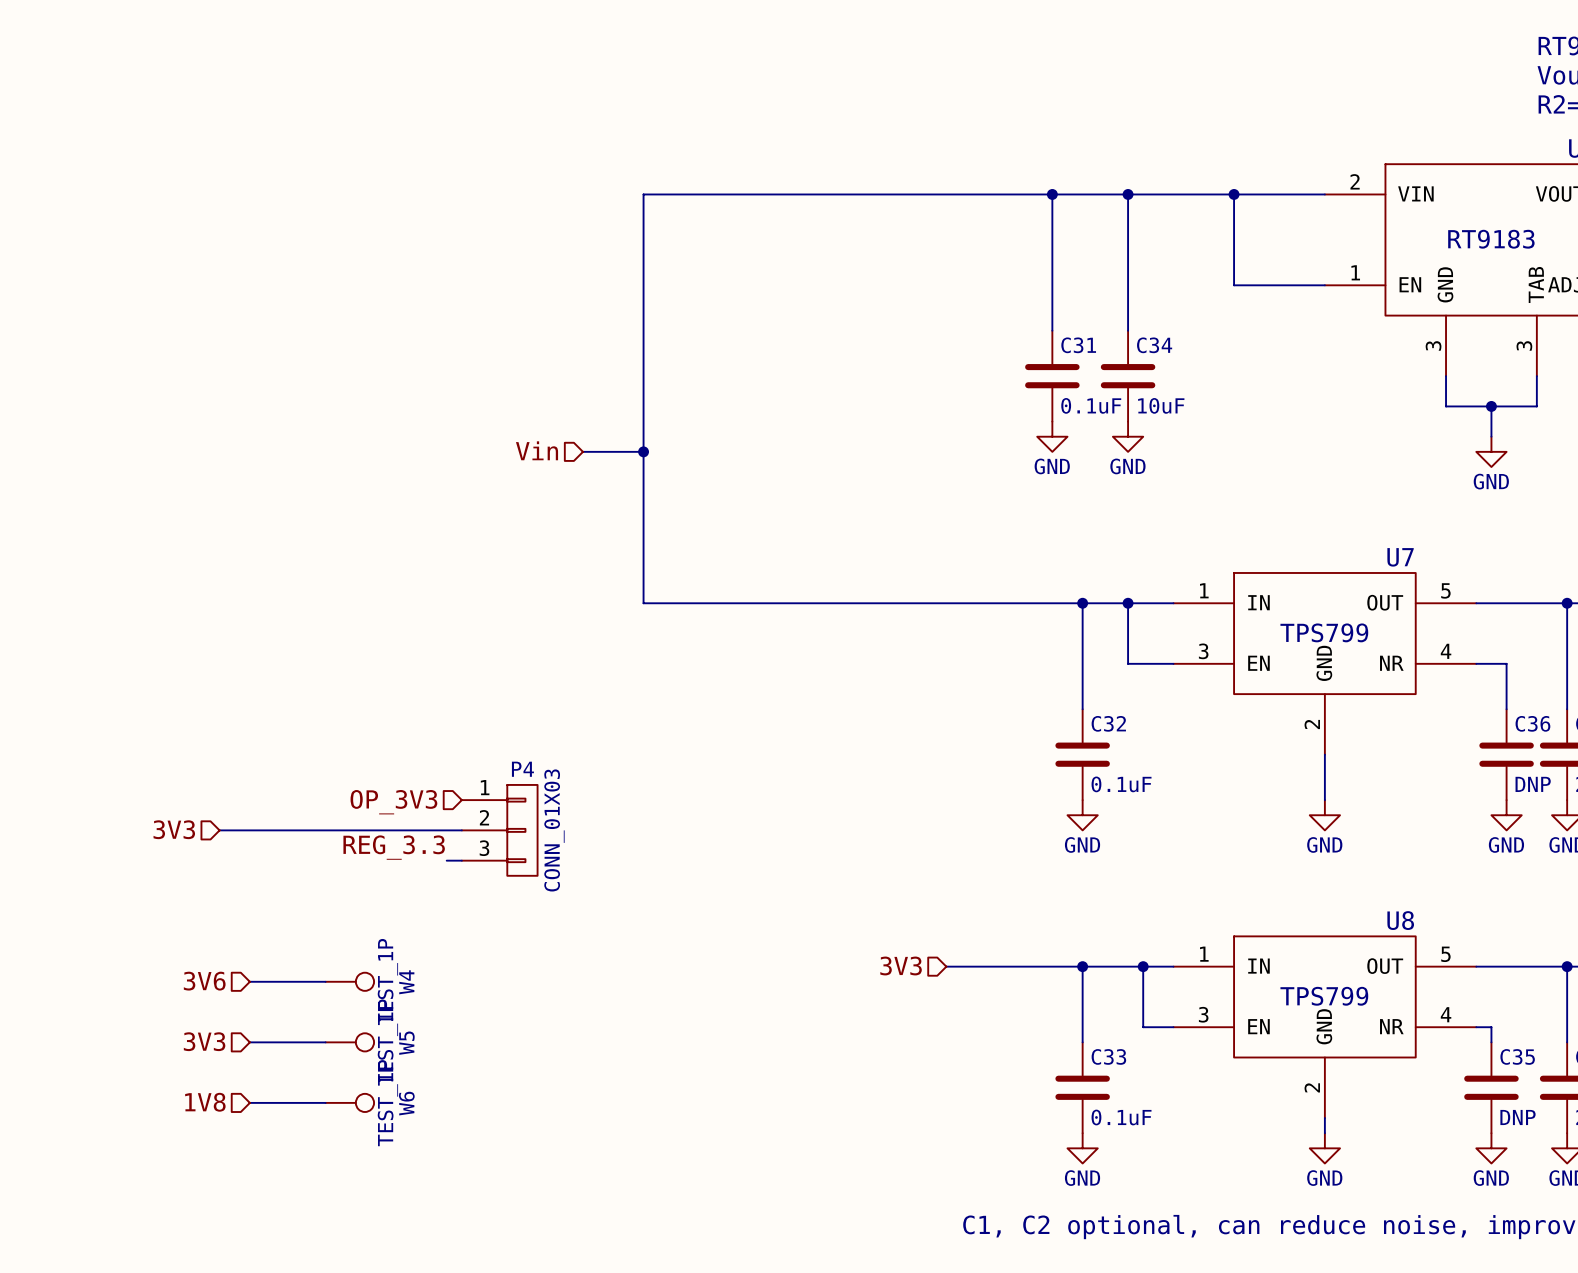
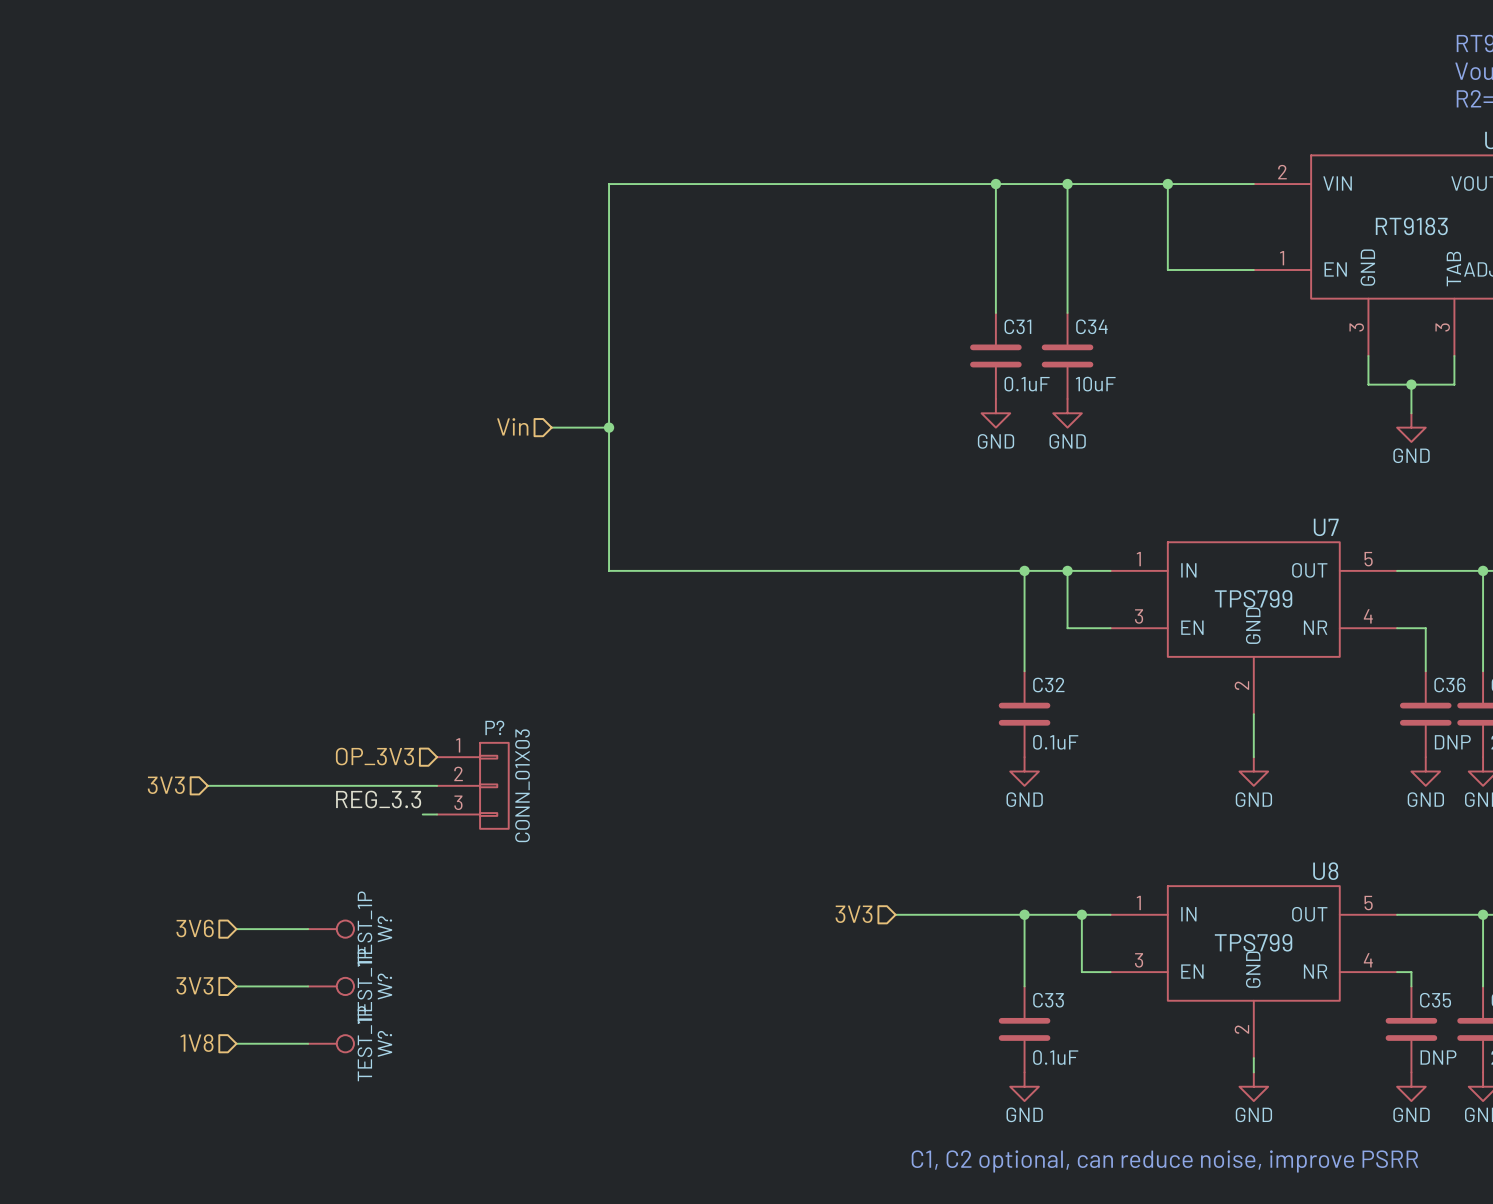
P4 name: P4 (522, 769) -> P? (494, 727)
W4 name: W4 (406, 982) -> W? (384, 929)
W5 name: W5 (406, 1043) -> W? (384, 986)
W6 name: W6 (406, 1103) -> W? (384, 1043)

